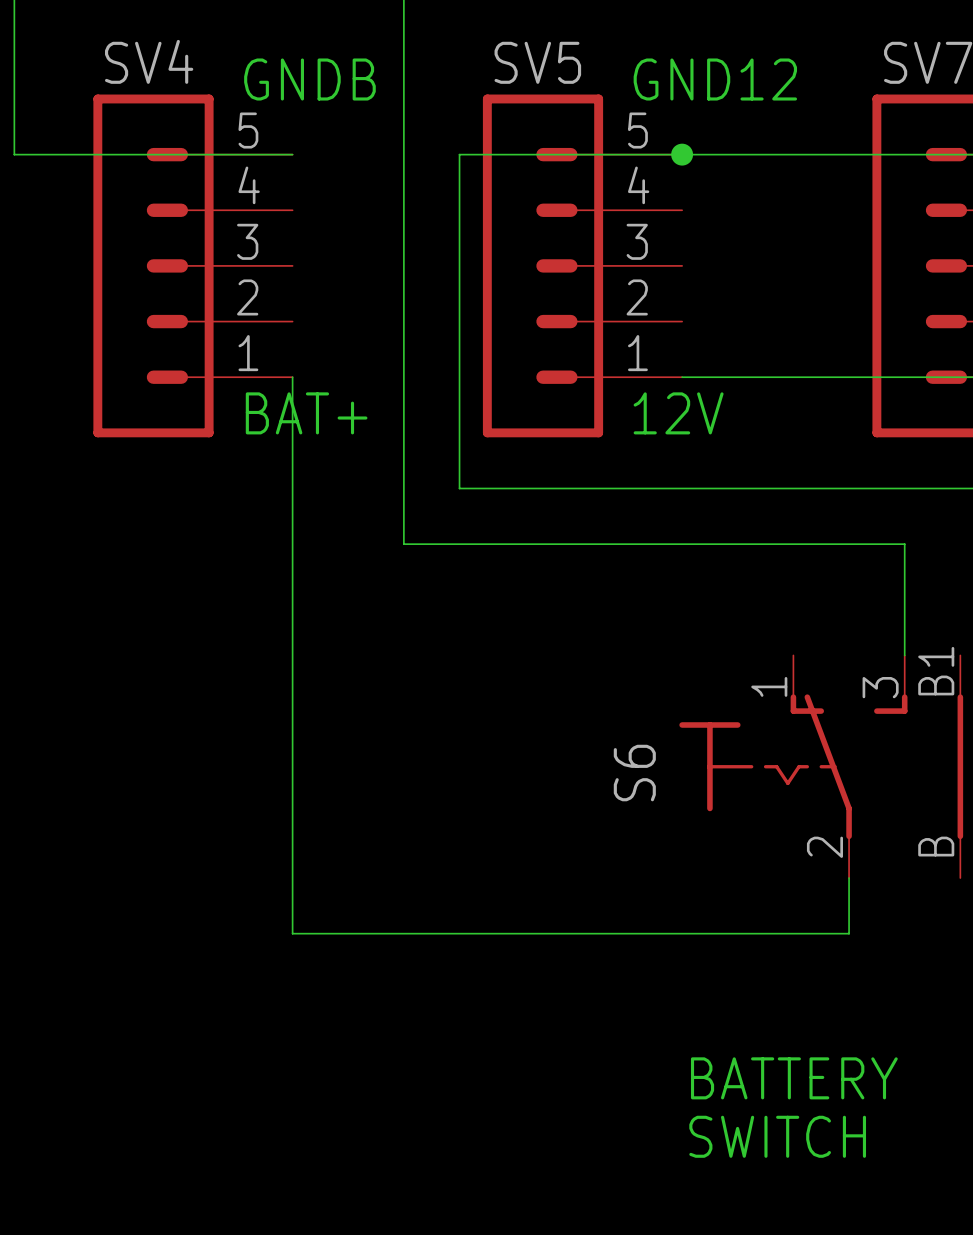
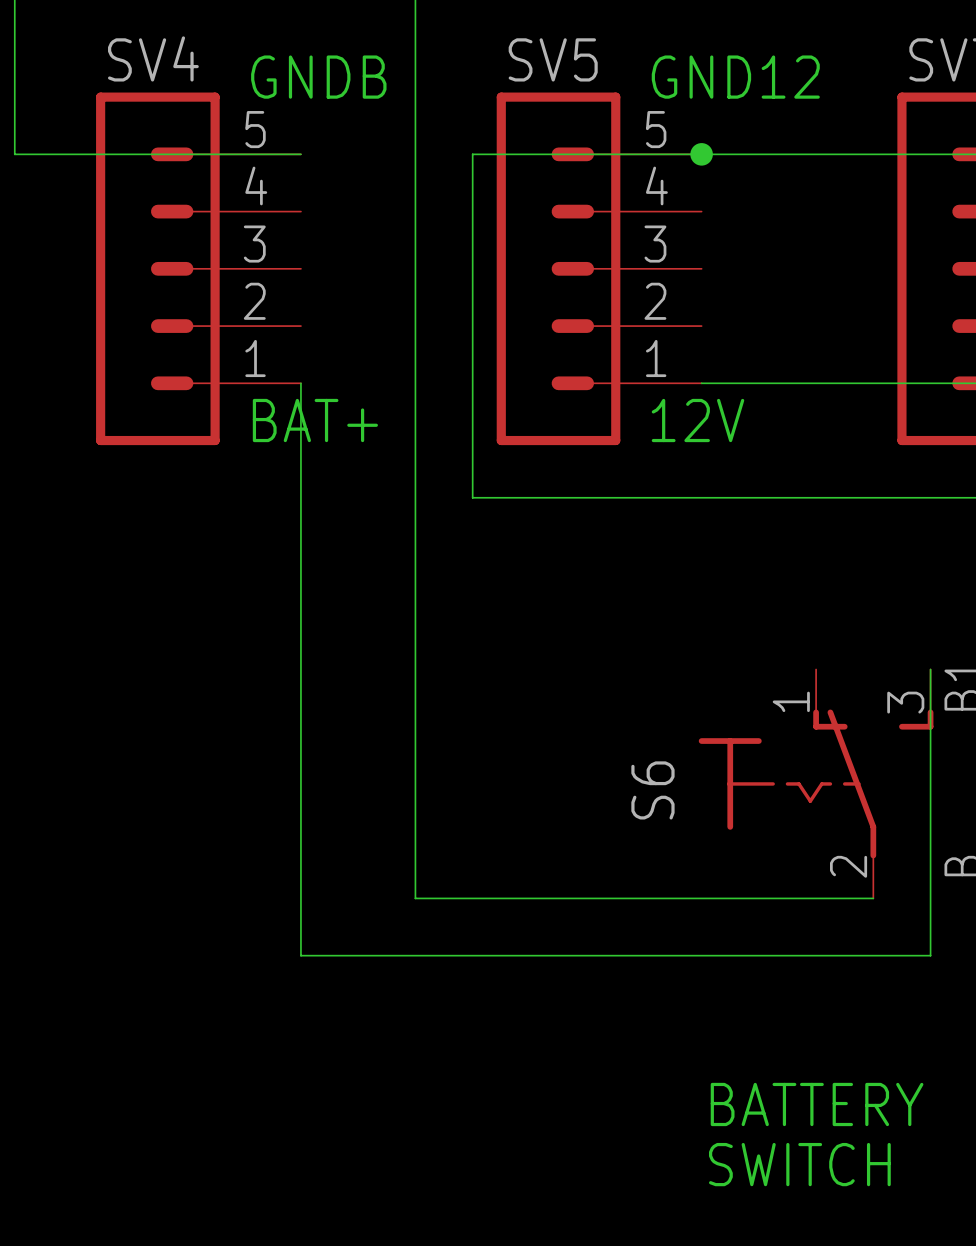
wire: (403, 544) (904, 544) (904, 655) -> (415, 555) (415, 898) (873, 898)
wire: (849, 878) (849, 933) -> (930, 669) (930, 955) (873, 955)

